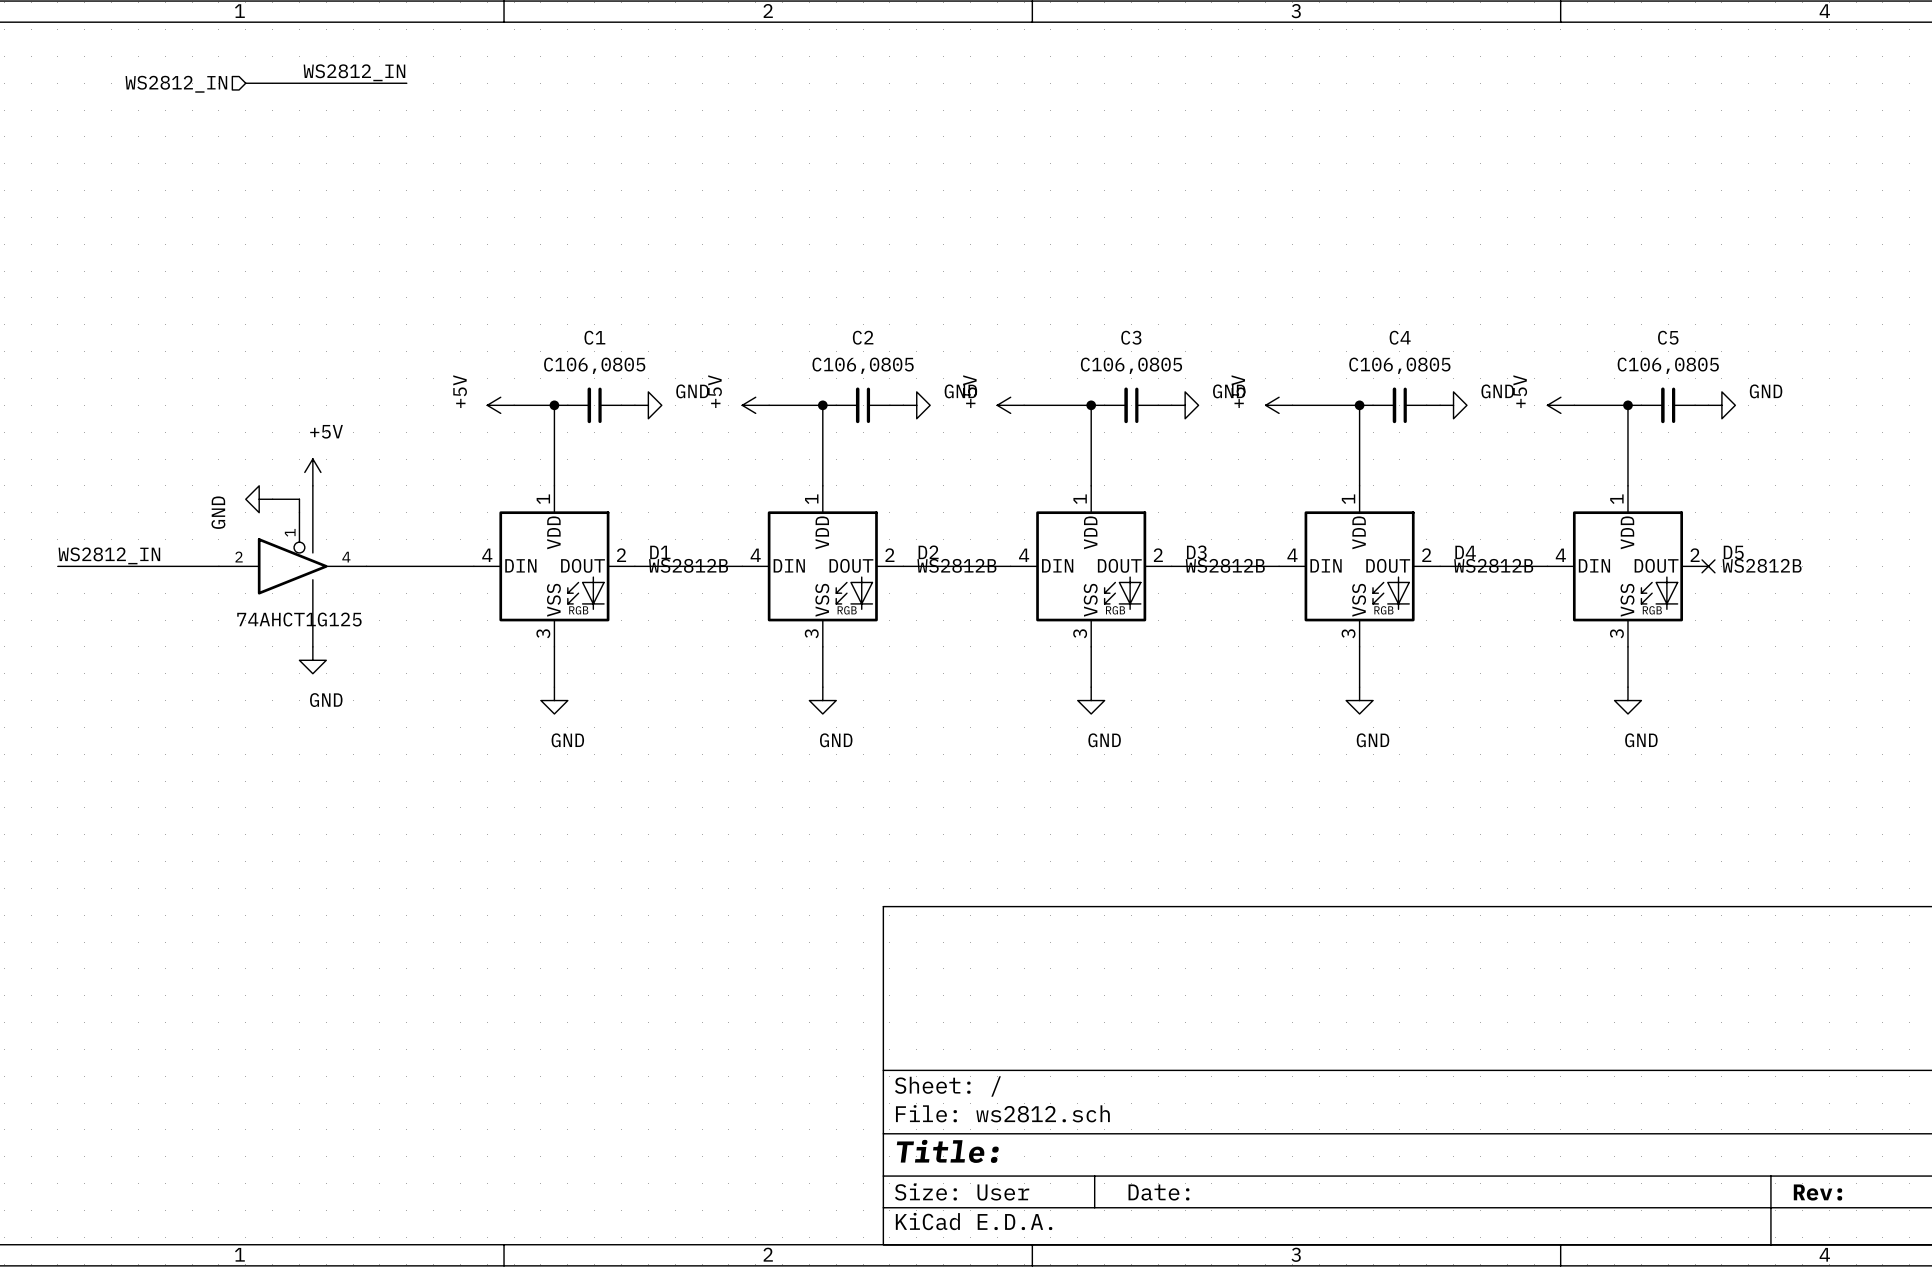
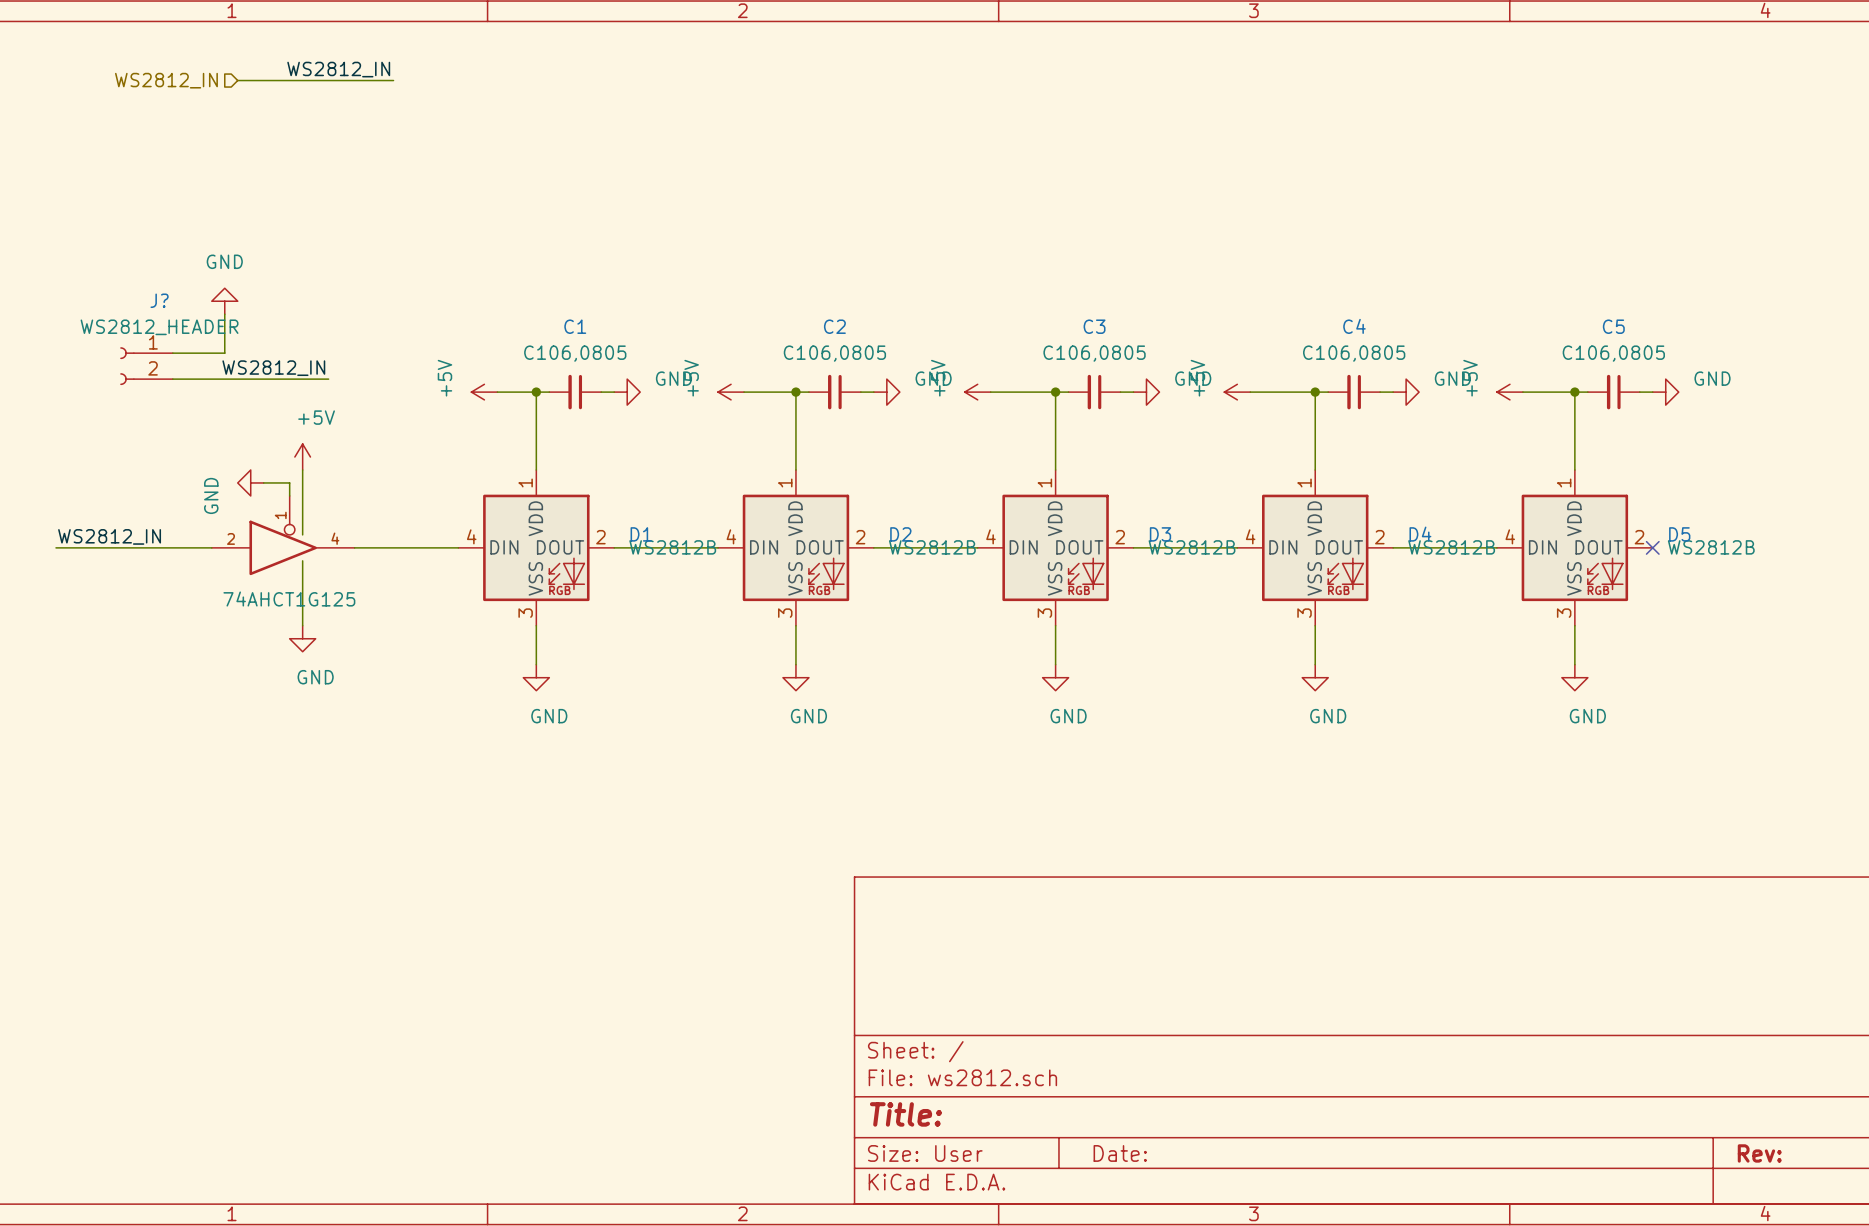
power symbol: none -> GND (224, 301)
wire: none -> (224, 314) (224, 353) (172, 353)
J?: none -> WS2812_HEADER (146, 366)
label: none -> WS2812_IN (273, 368)
wire: none -> (172, 379) (328, 379)

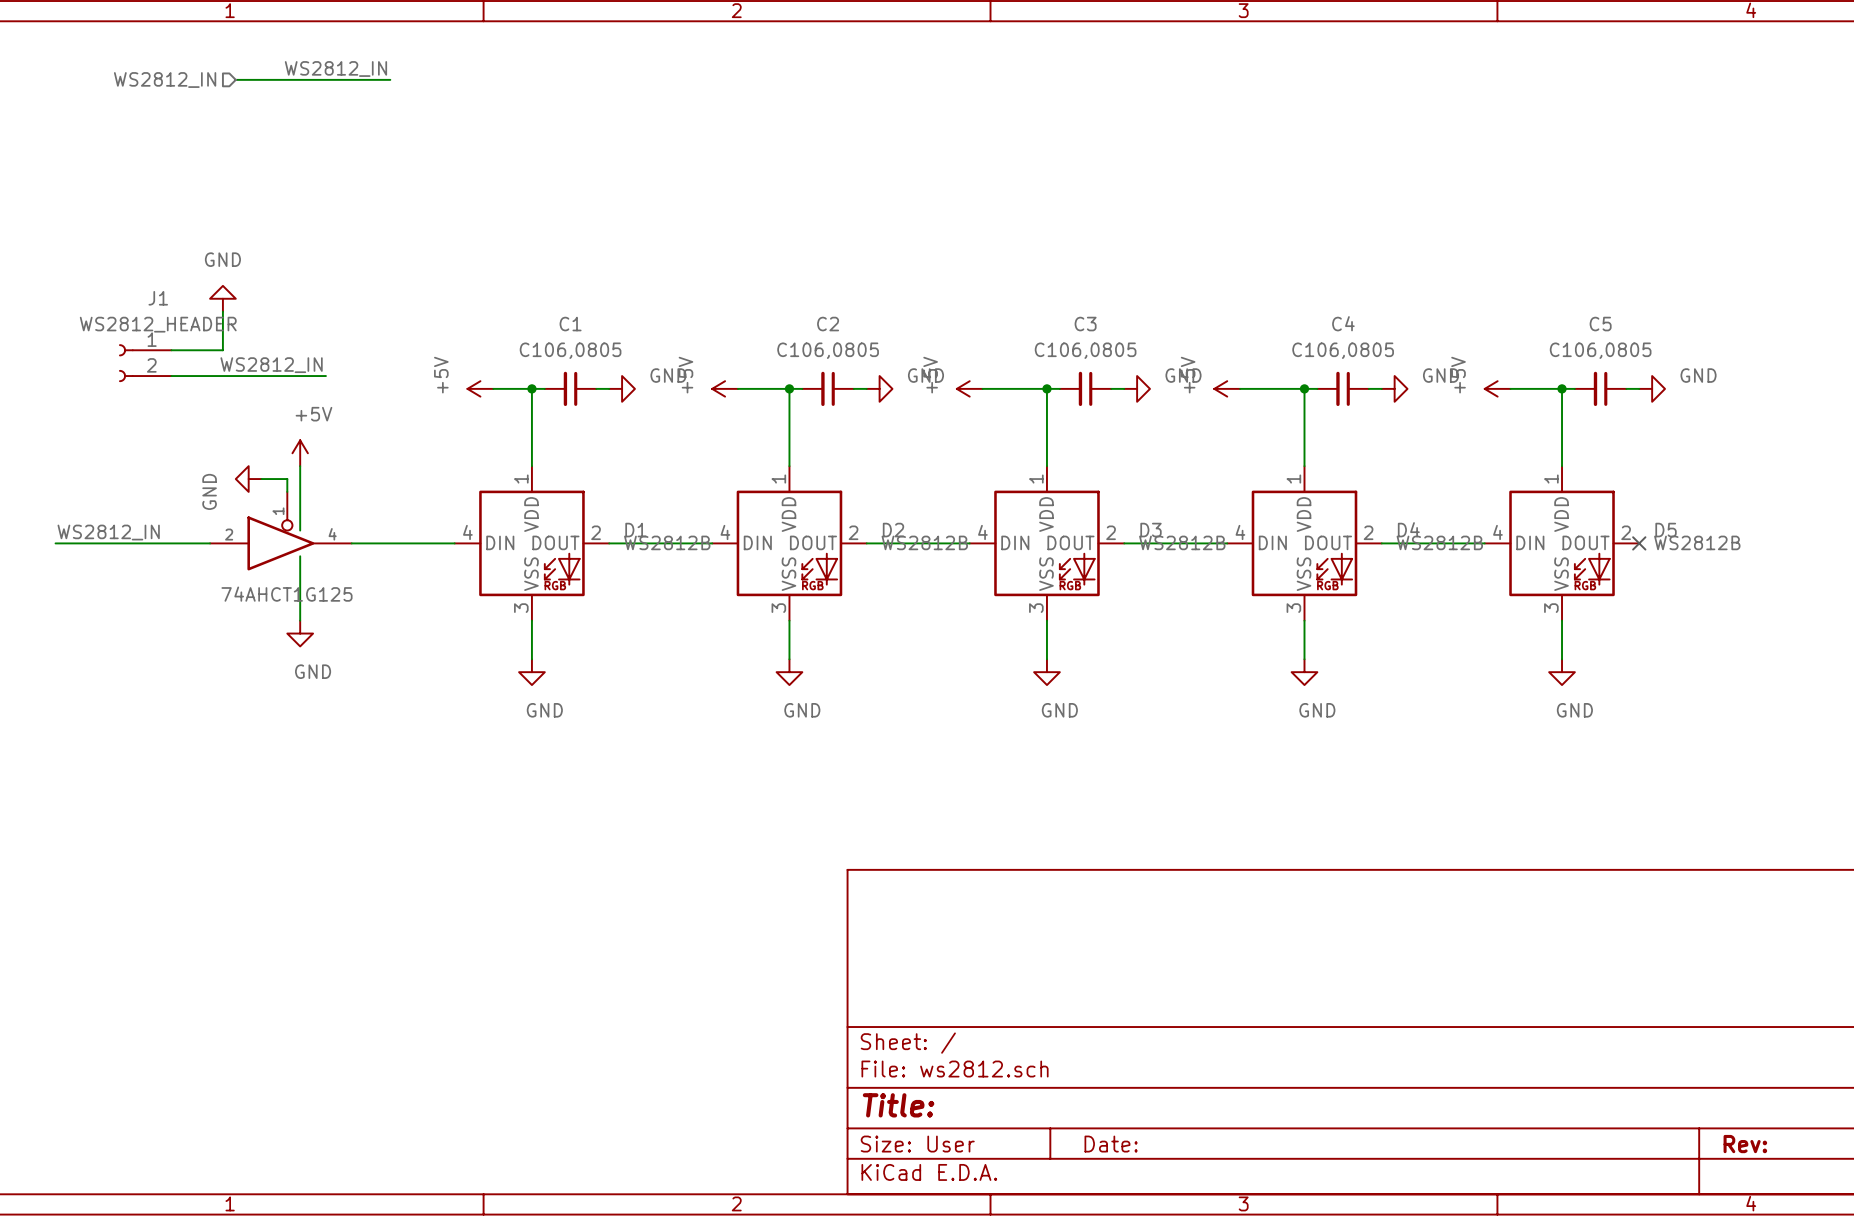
J? name: J? (159, 300) -> J1 (158, 298)

